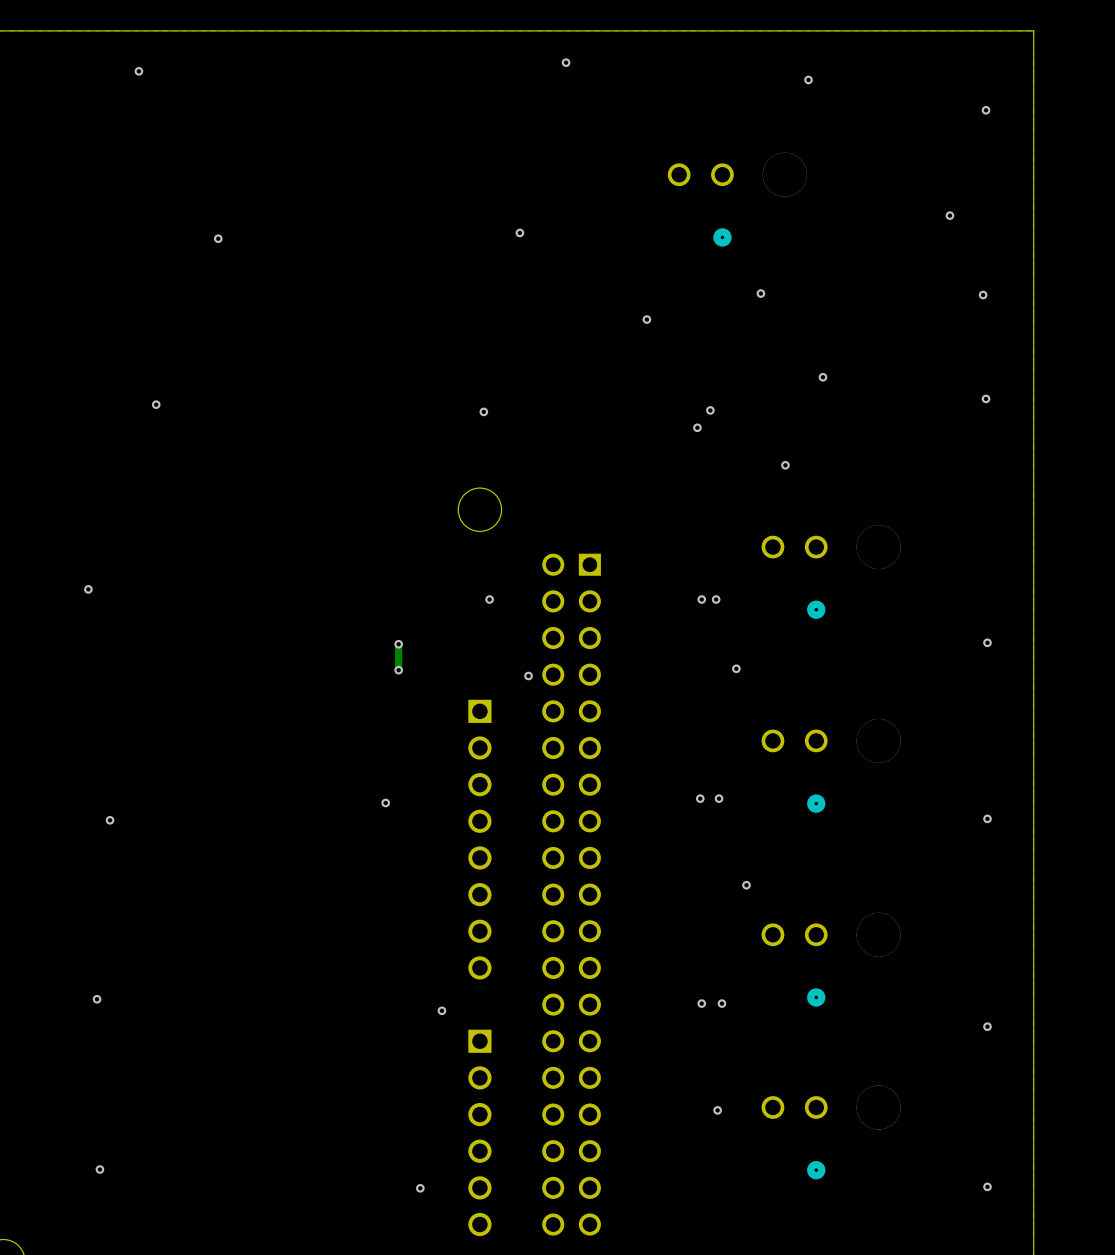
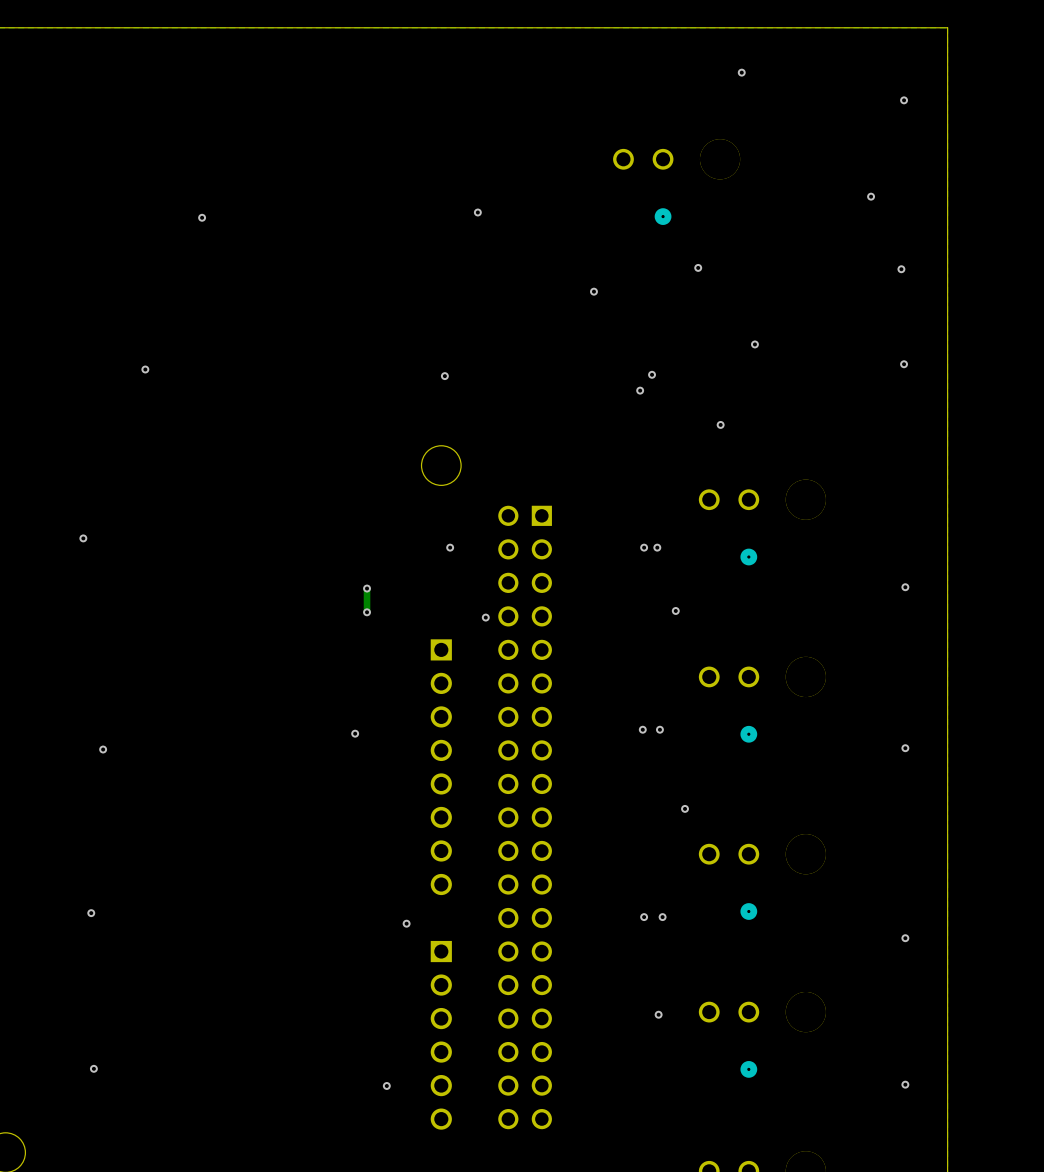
via: (566, 62) -> none
via: (138, 71) -> none

